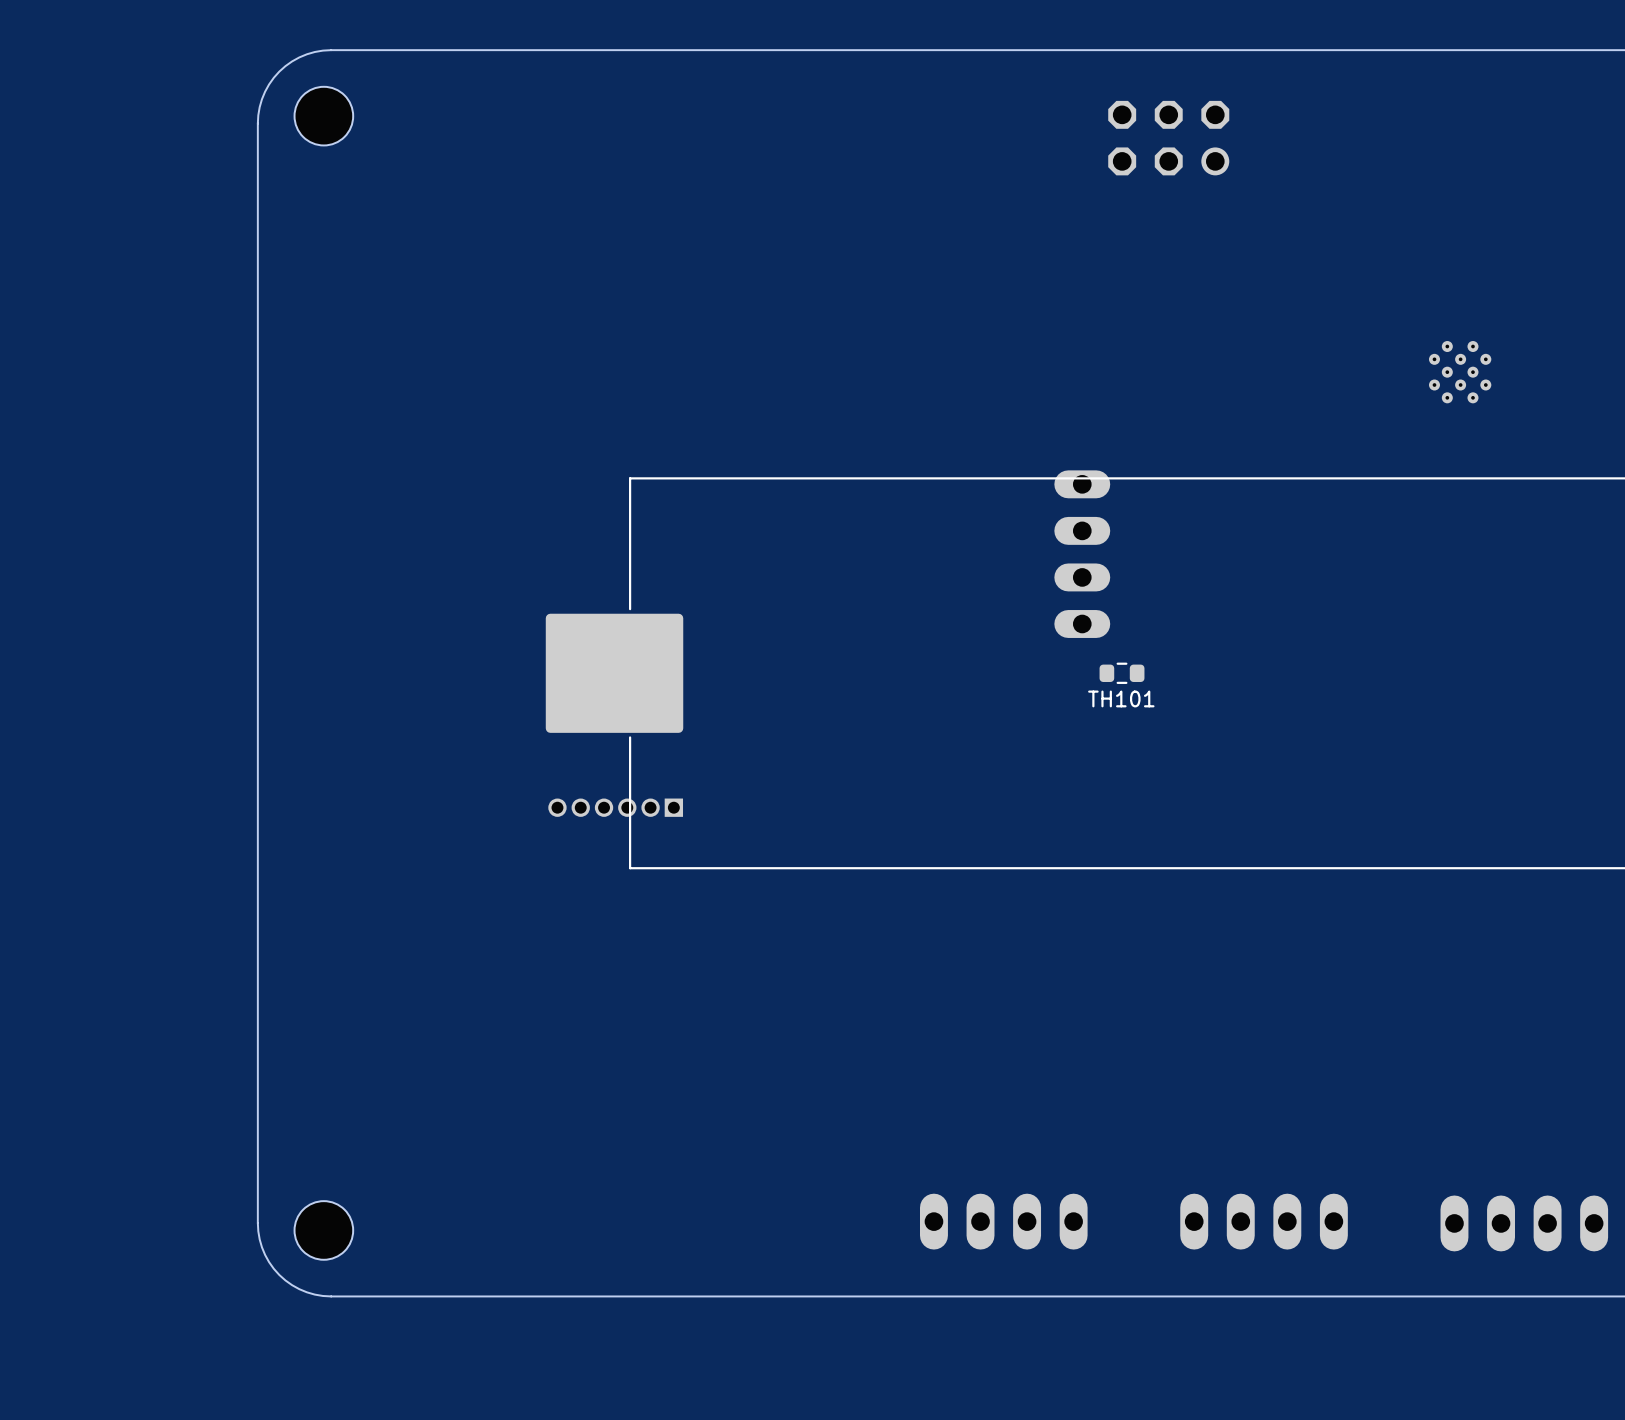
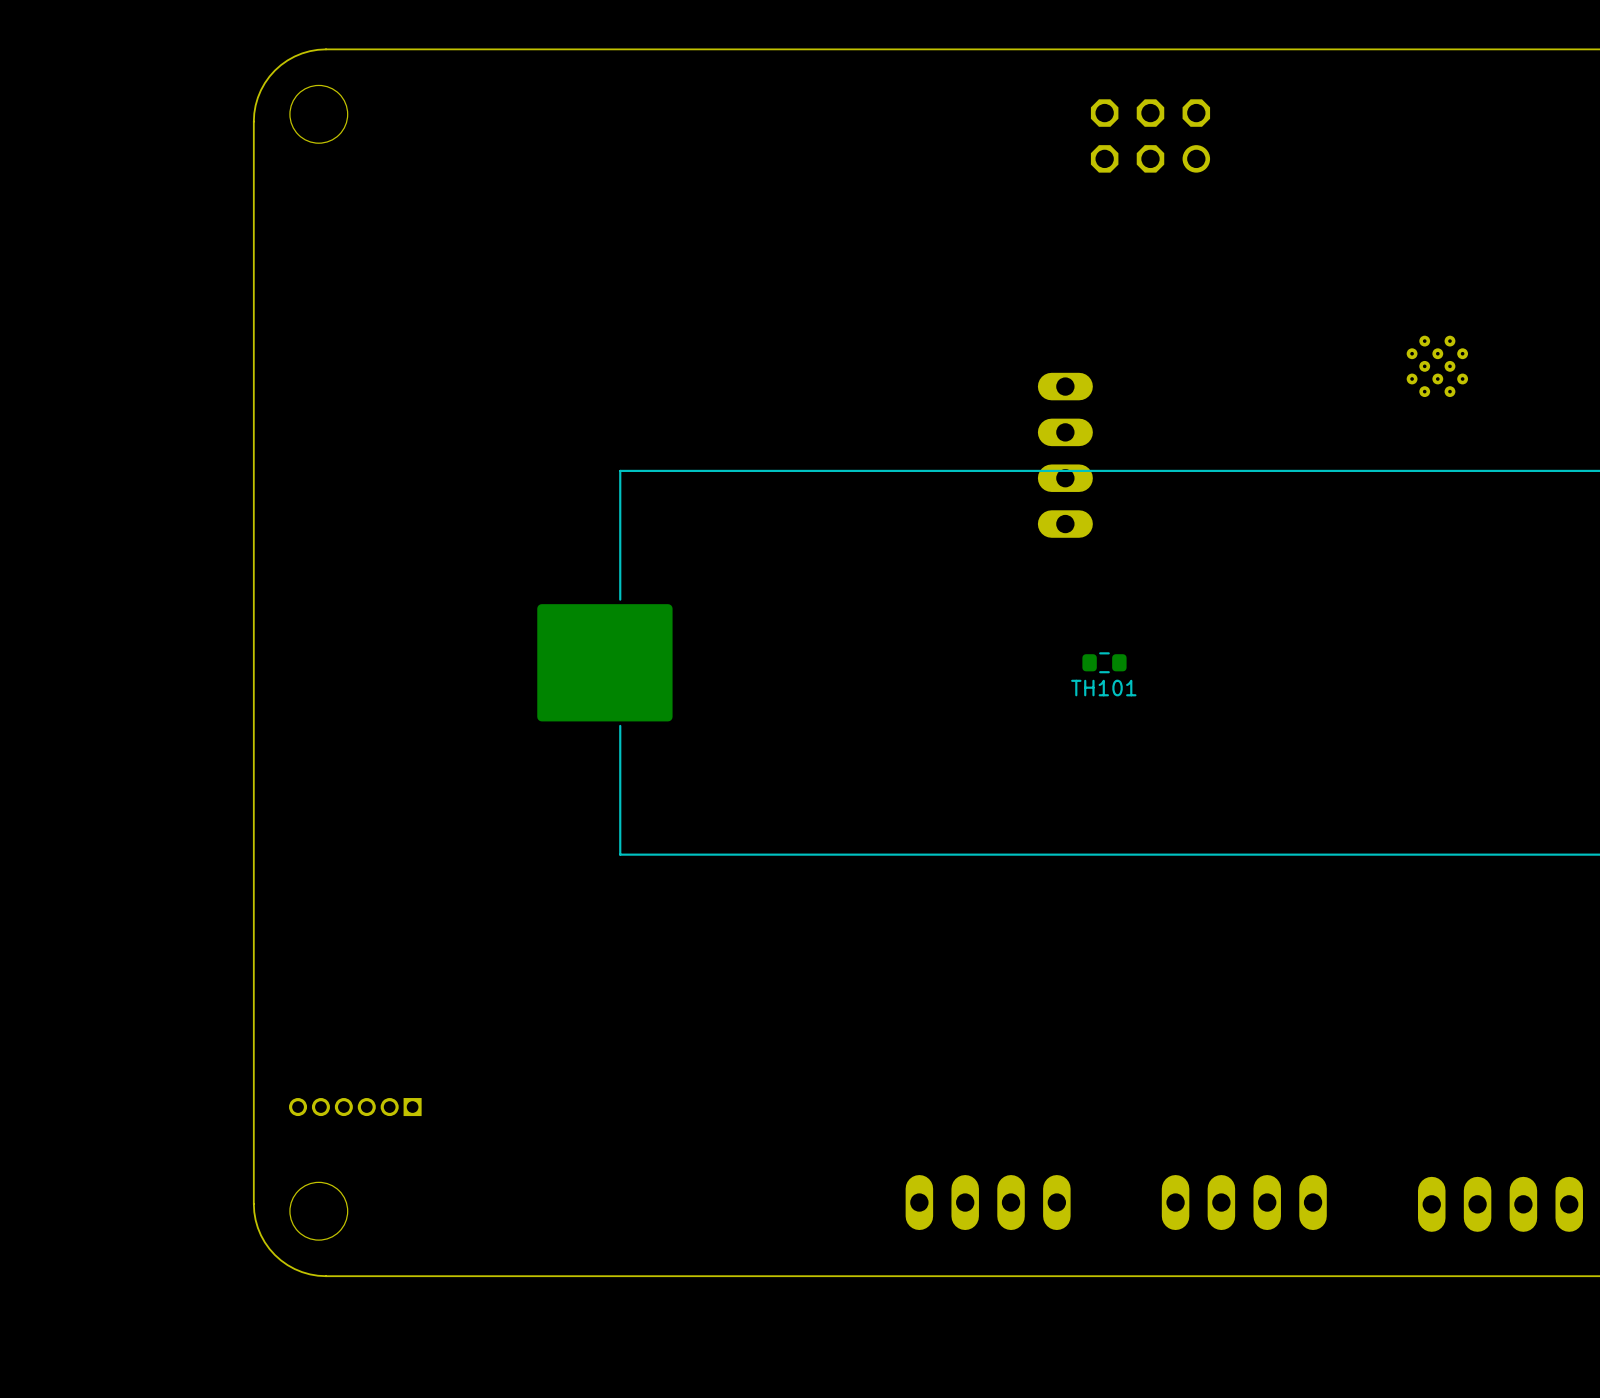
part position: (1082, 554) -> (1065, 455)
part position: (615, 807) -> (355, 1107)

